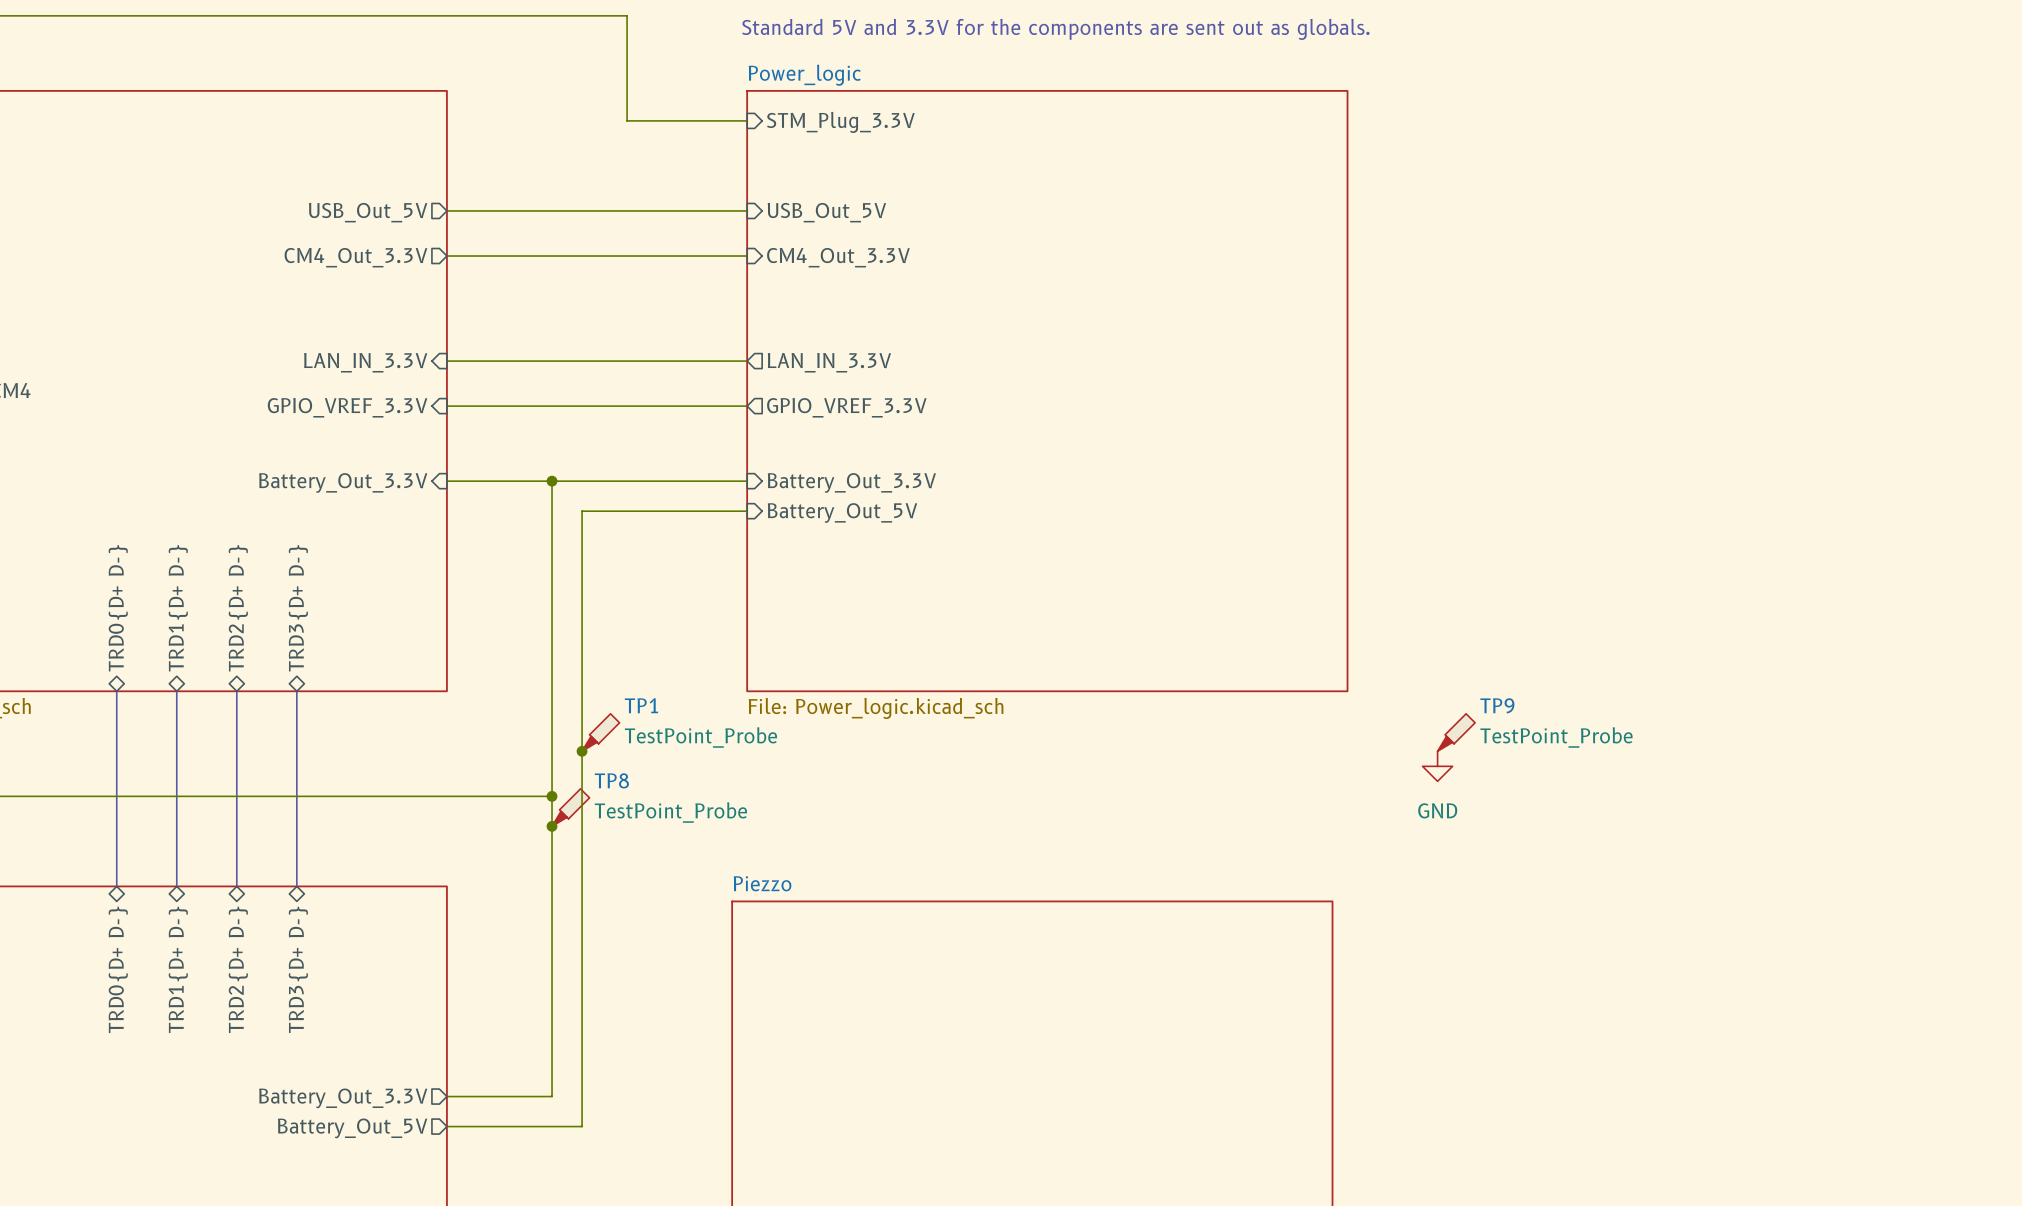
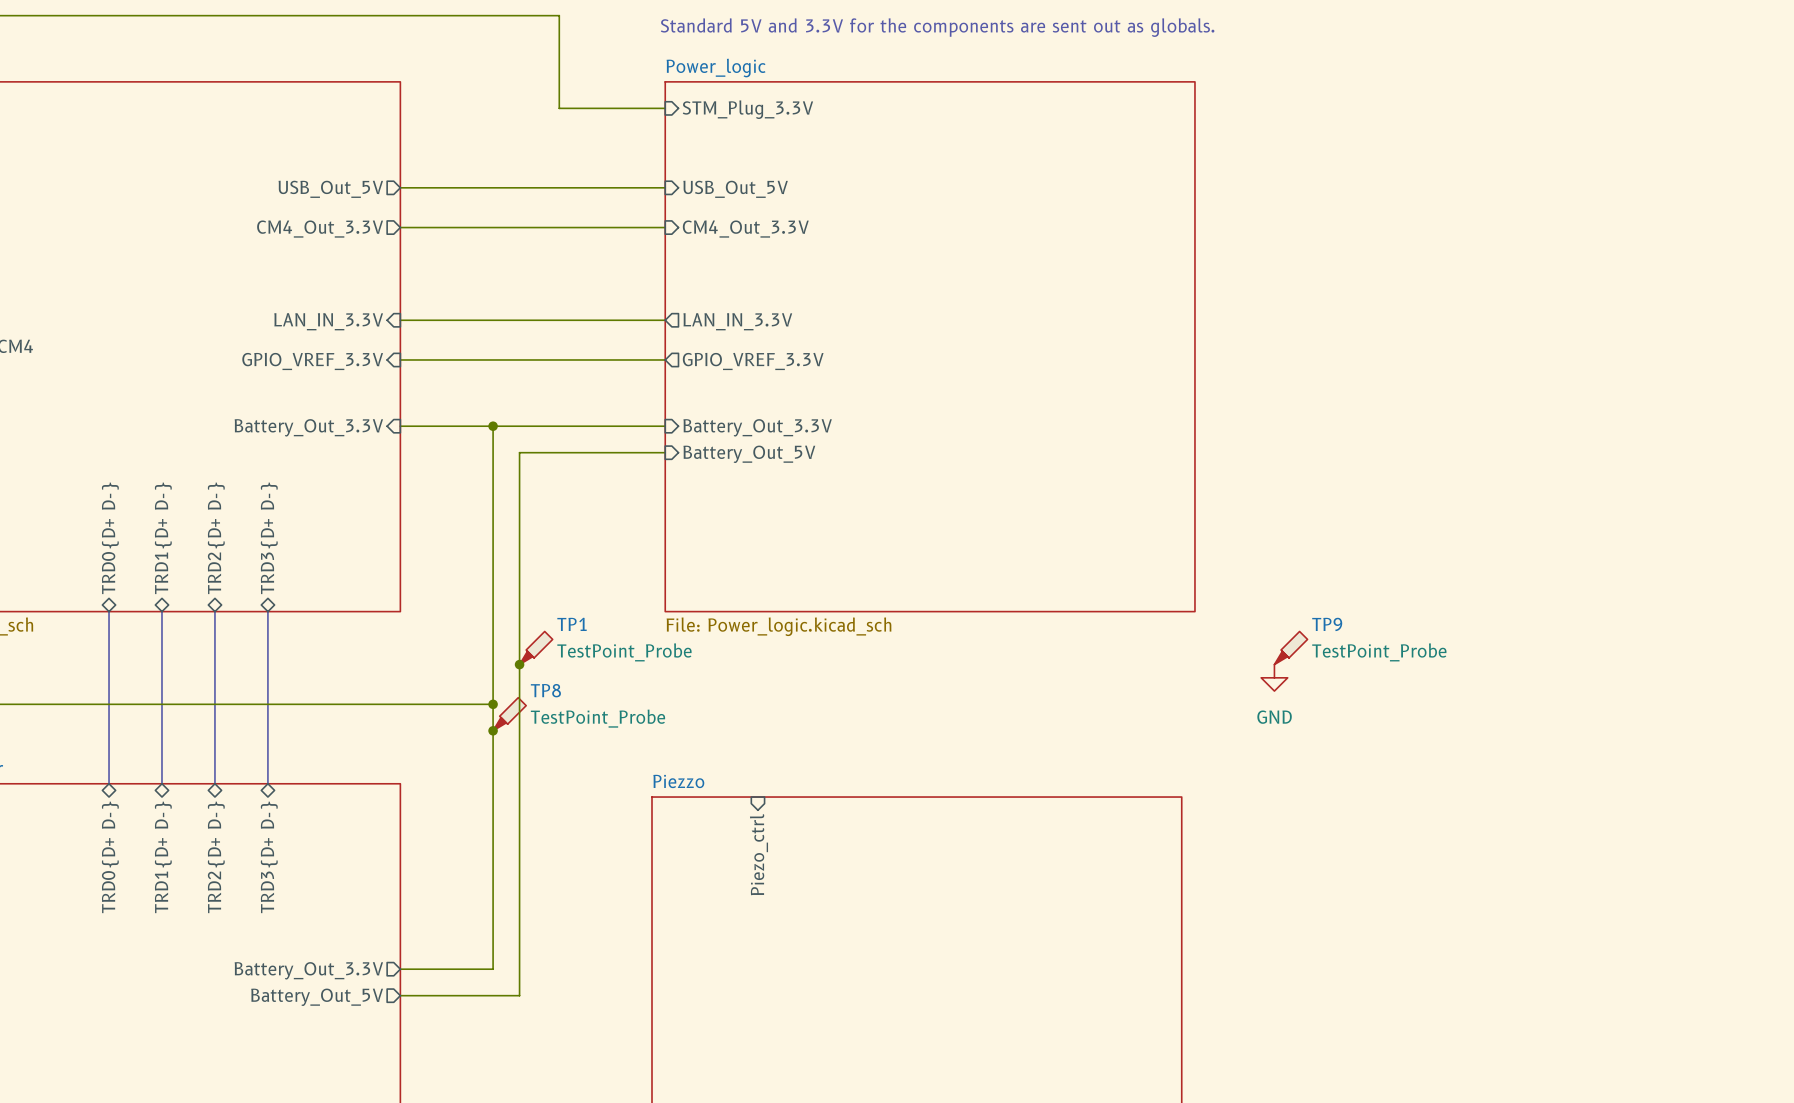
sheet pin: none -> Piezo_ctrl (758, 854)

